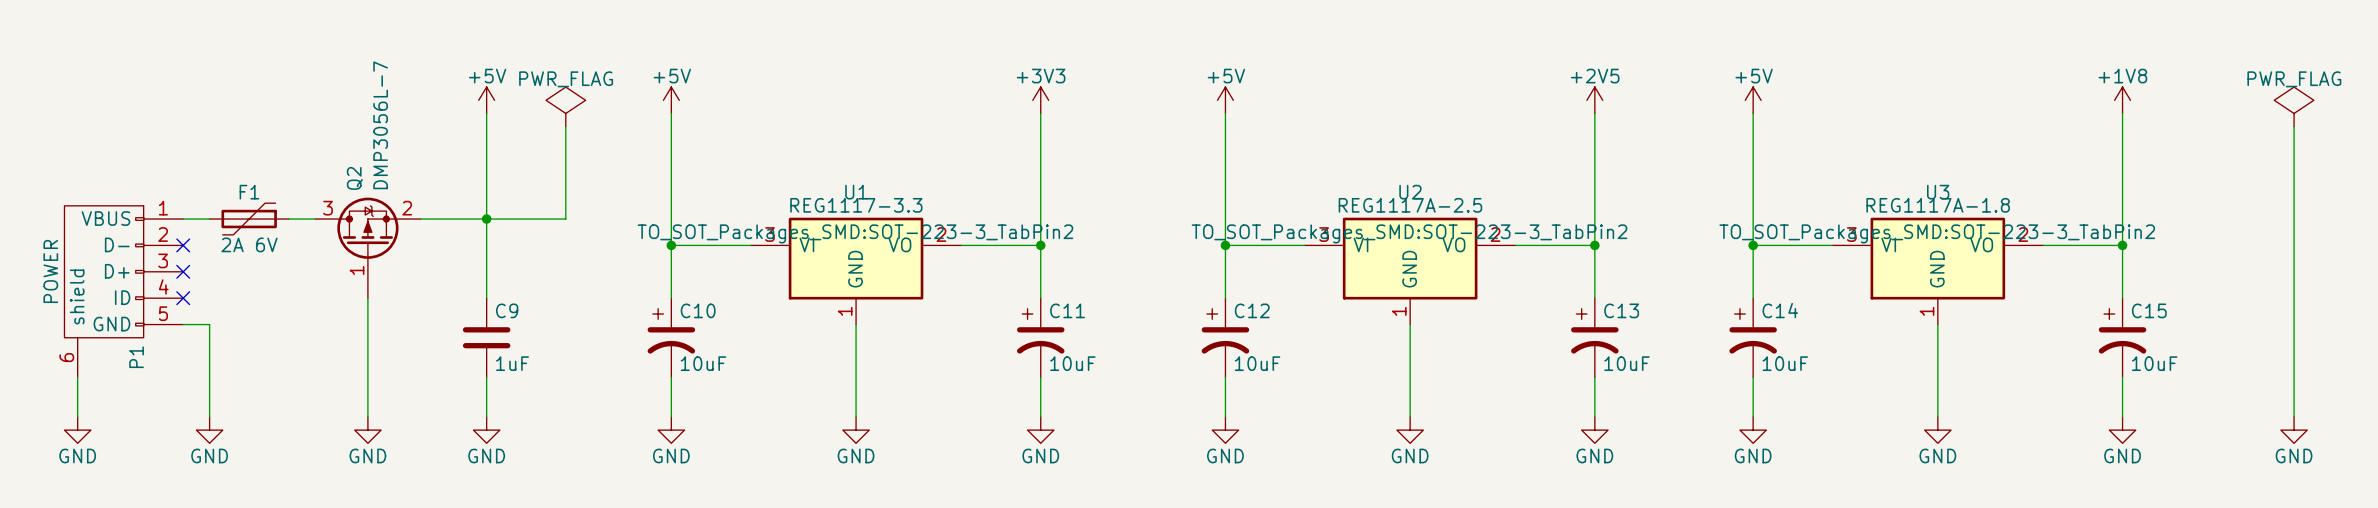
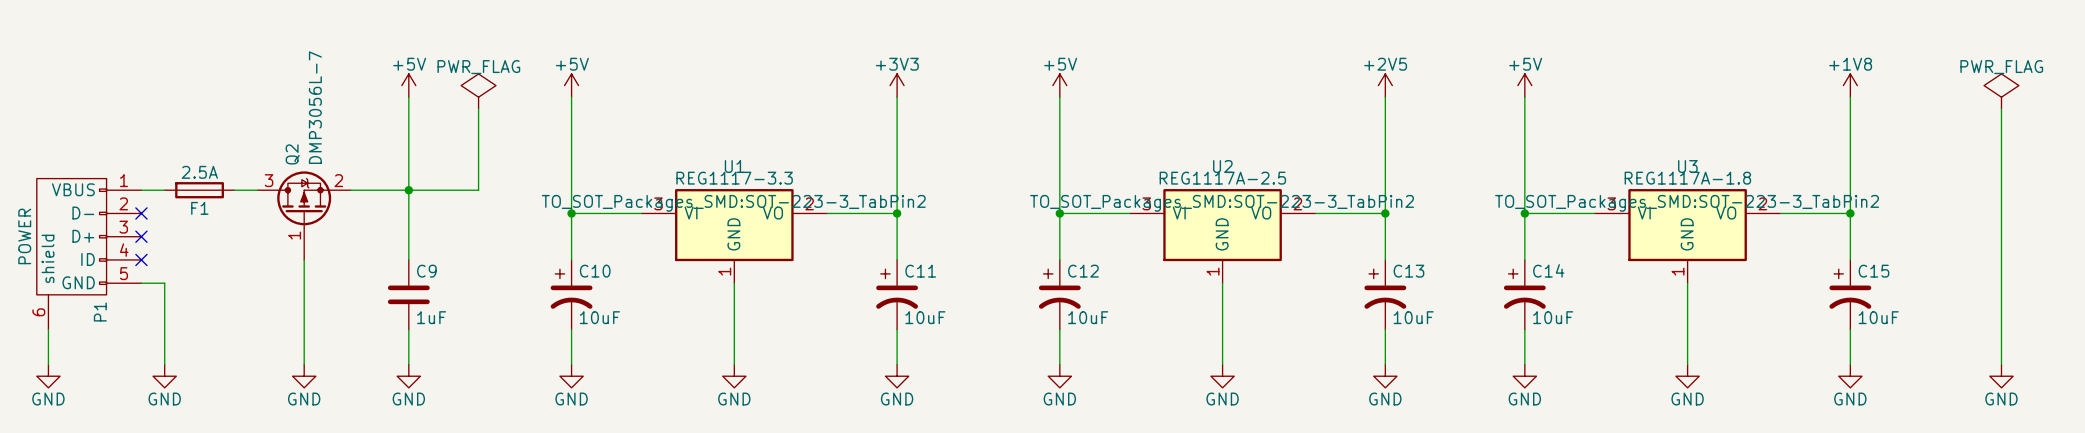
F1 name position: F1 (249, 192) -> F1 (199, 208)
F1 symbol: [209, 203, 289, 235] -> [164, 182, 235, 199]
F1 value: 2A 6V (249, 244) -> 2.5A (199, 172)

